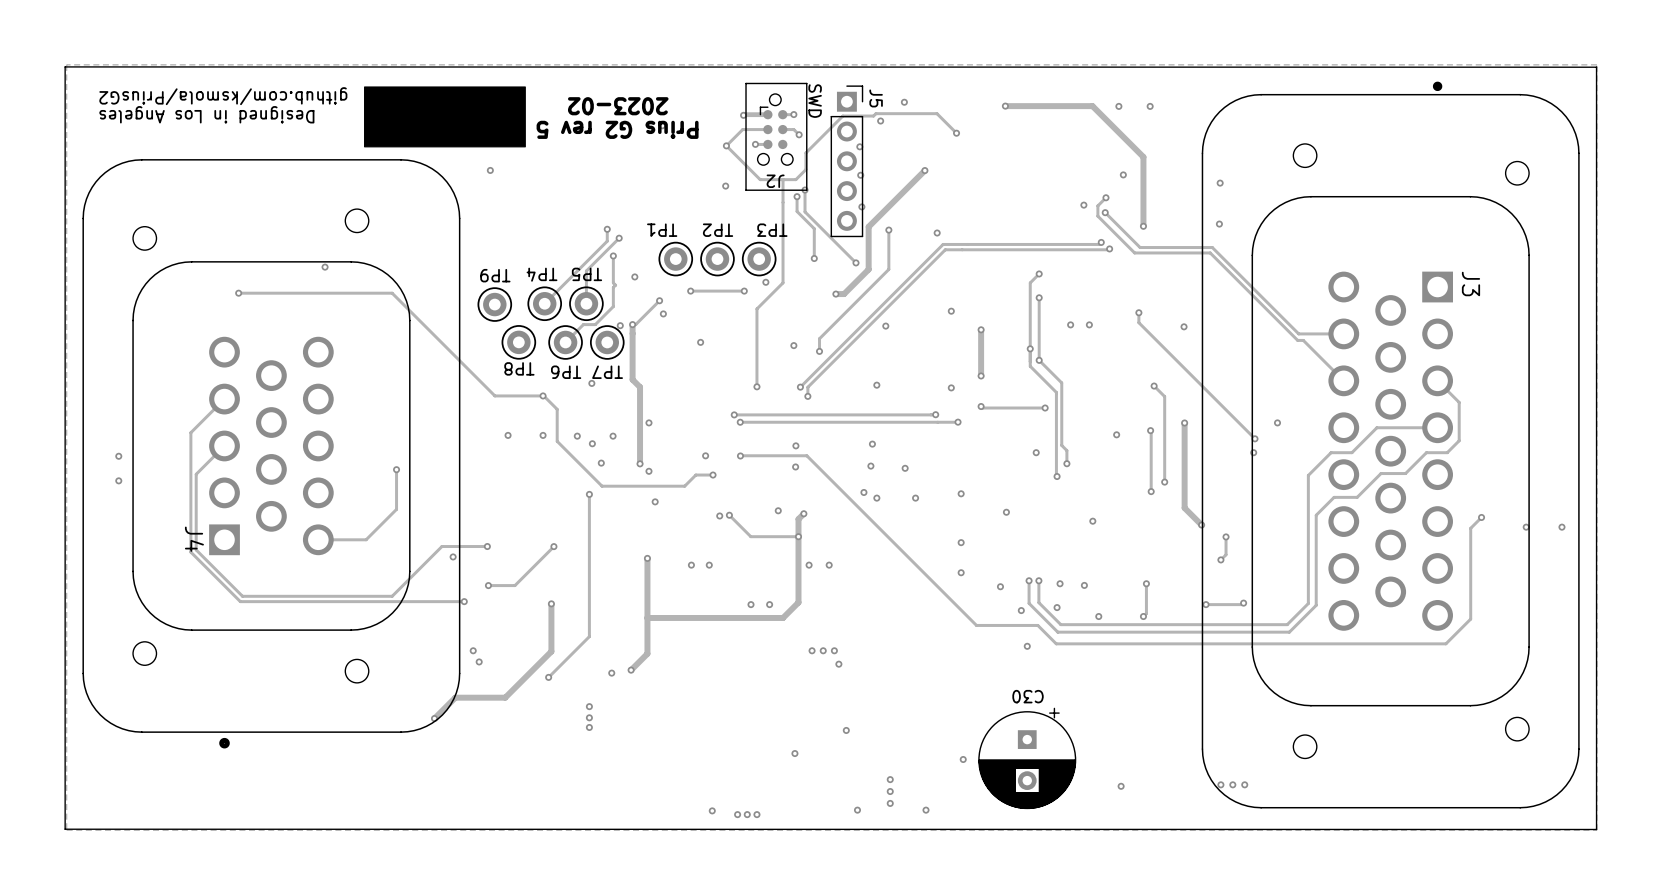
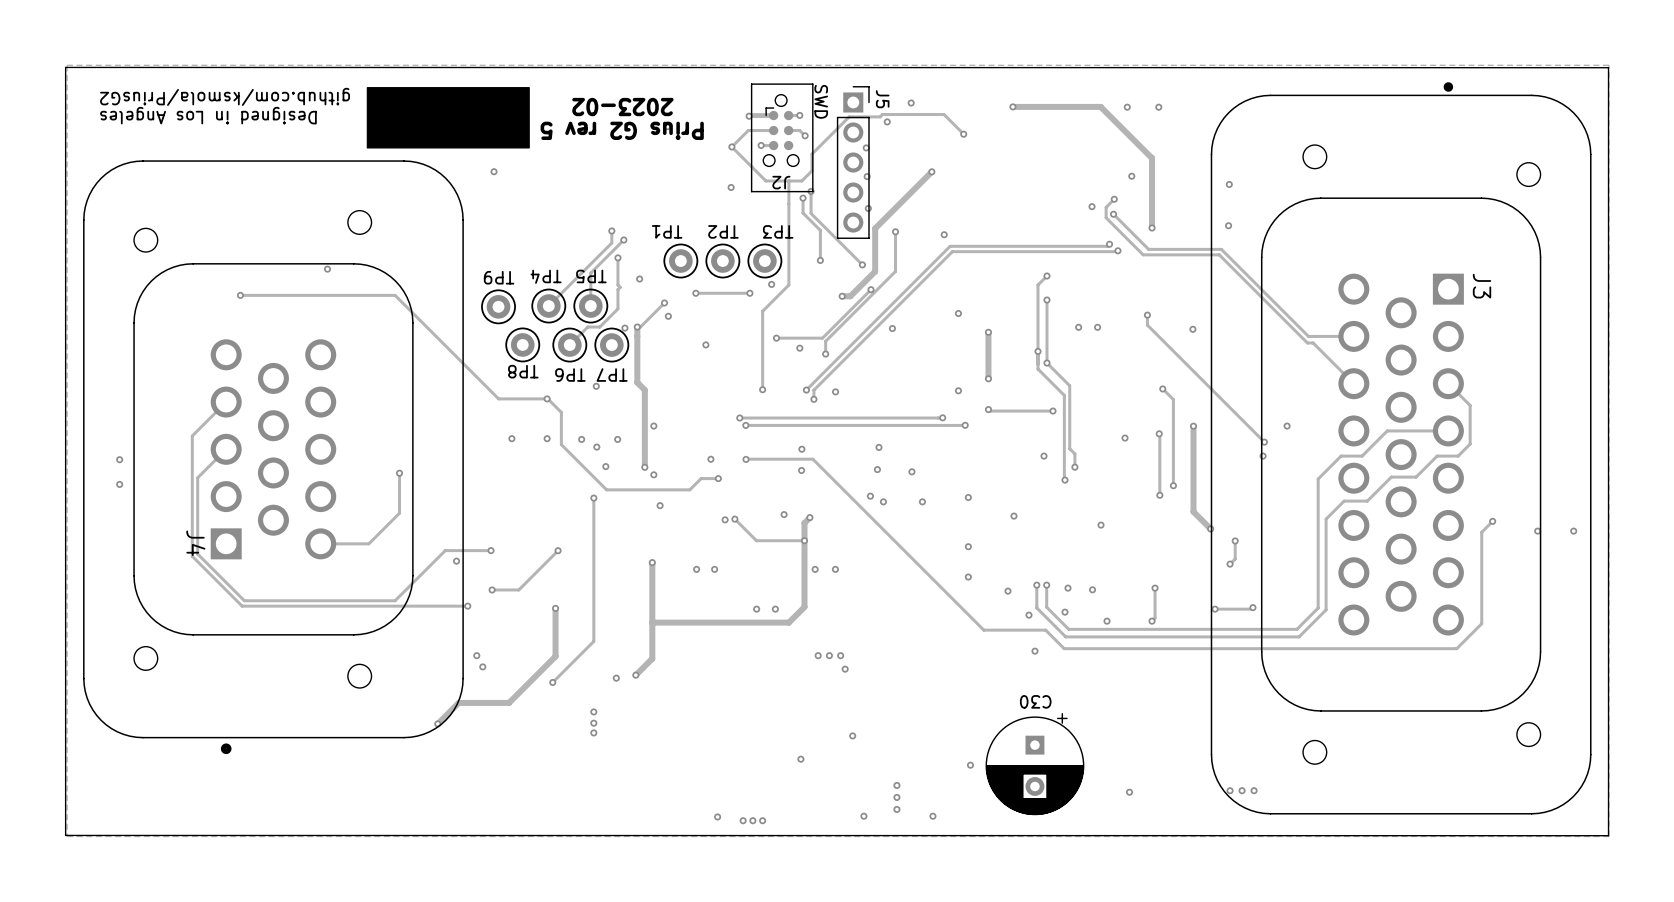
track: none -> (871, 289) (822, 338) (776, 338)
via: none -> (871, 289)
via: none -> (776, 338)
via position: (876, 385) -> (835, 391)

